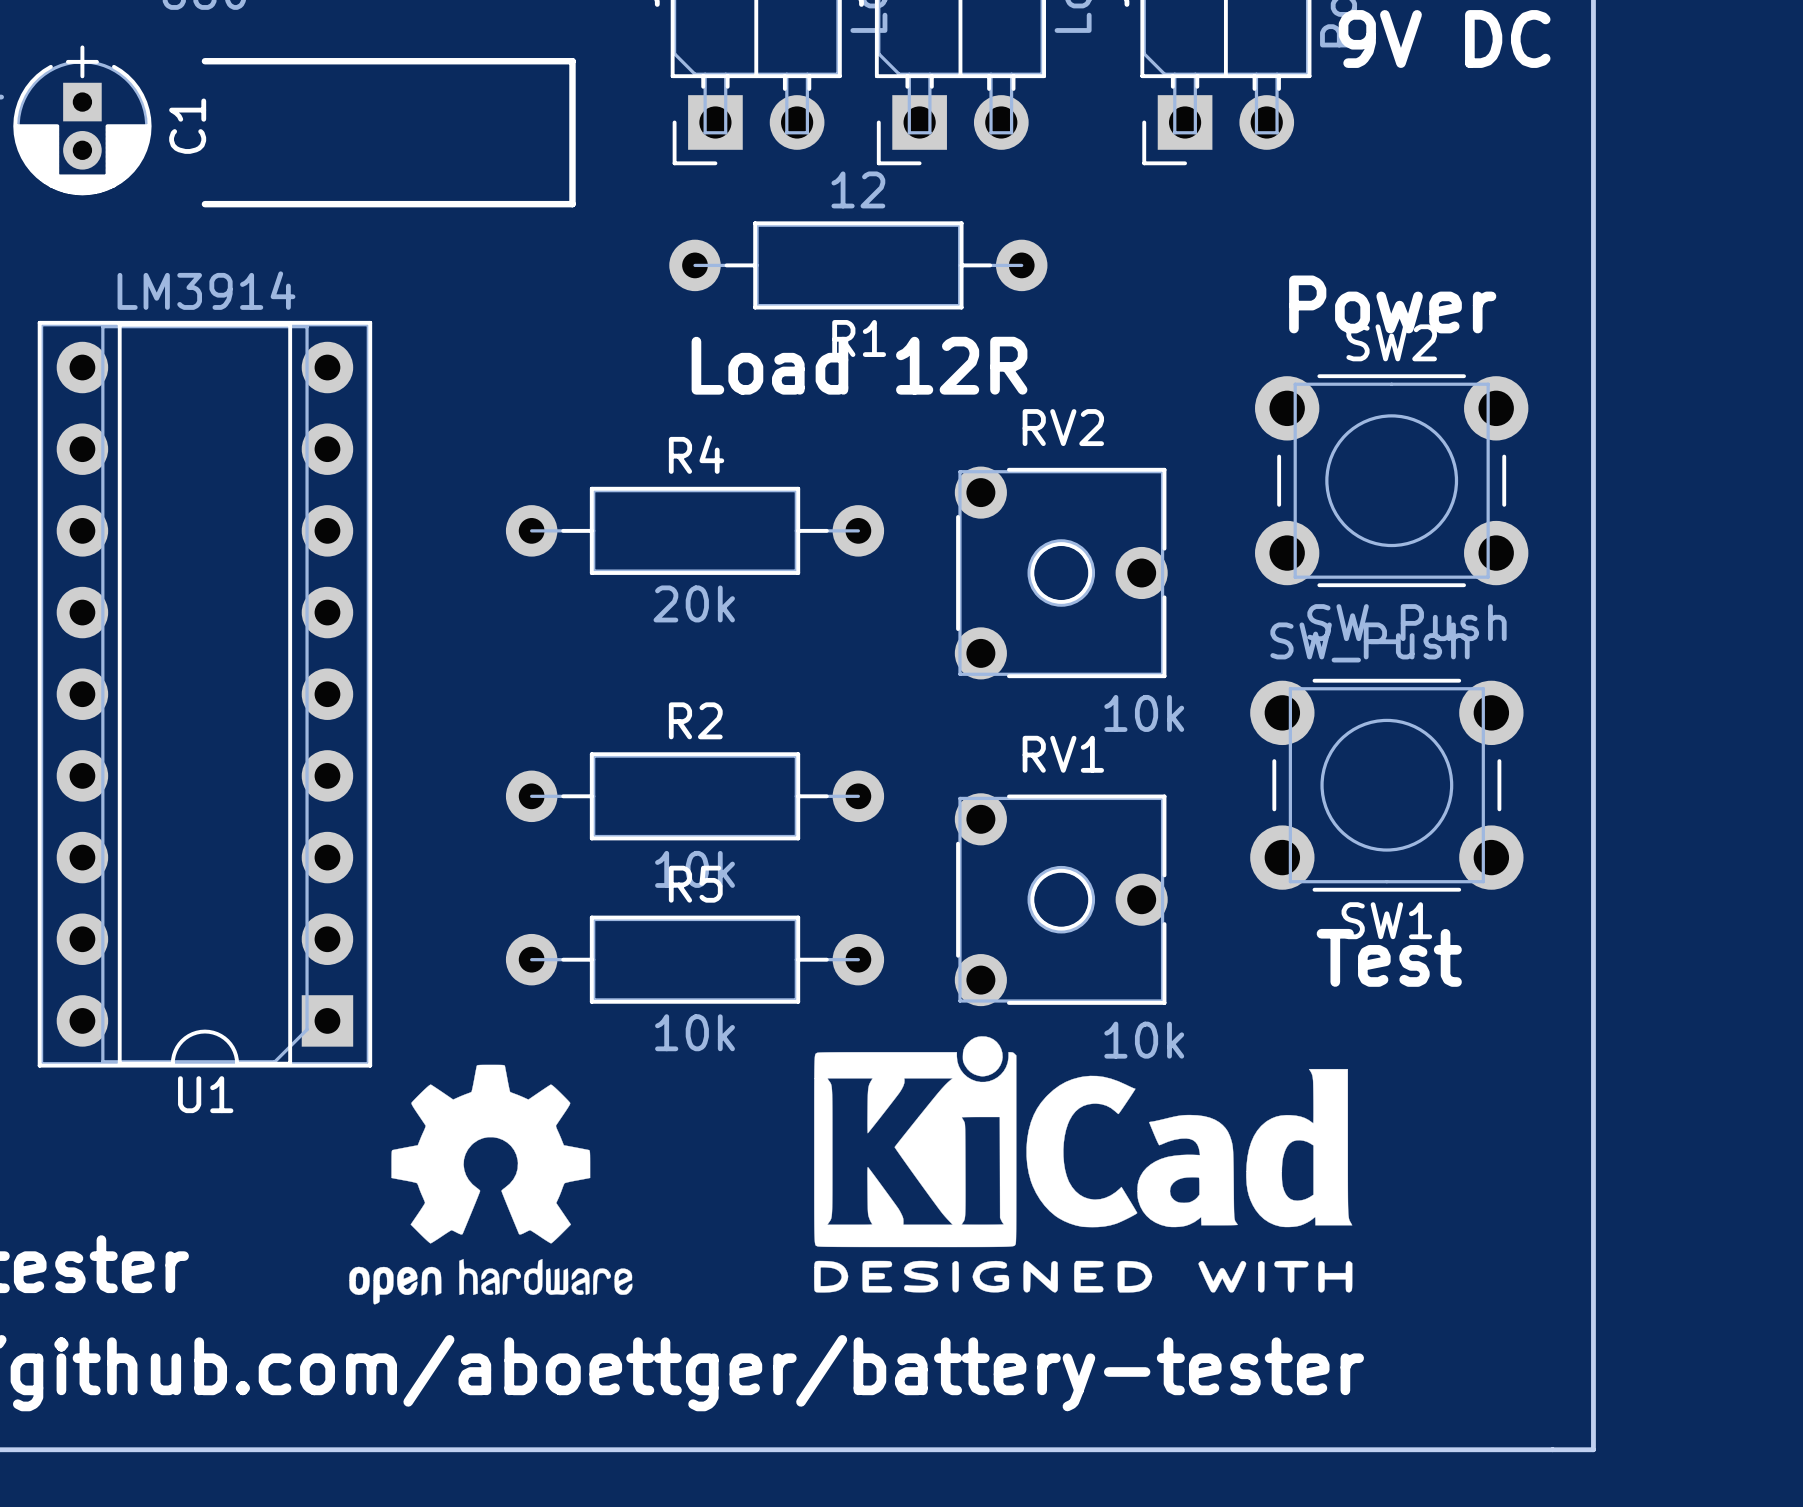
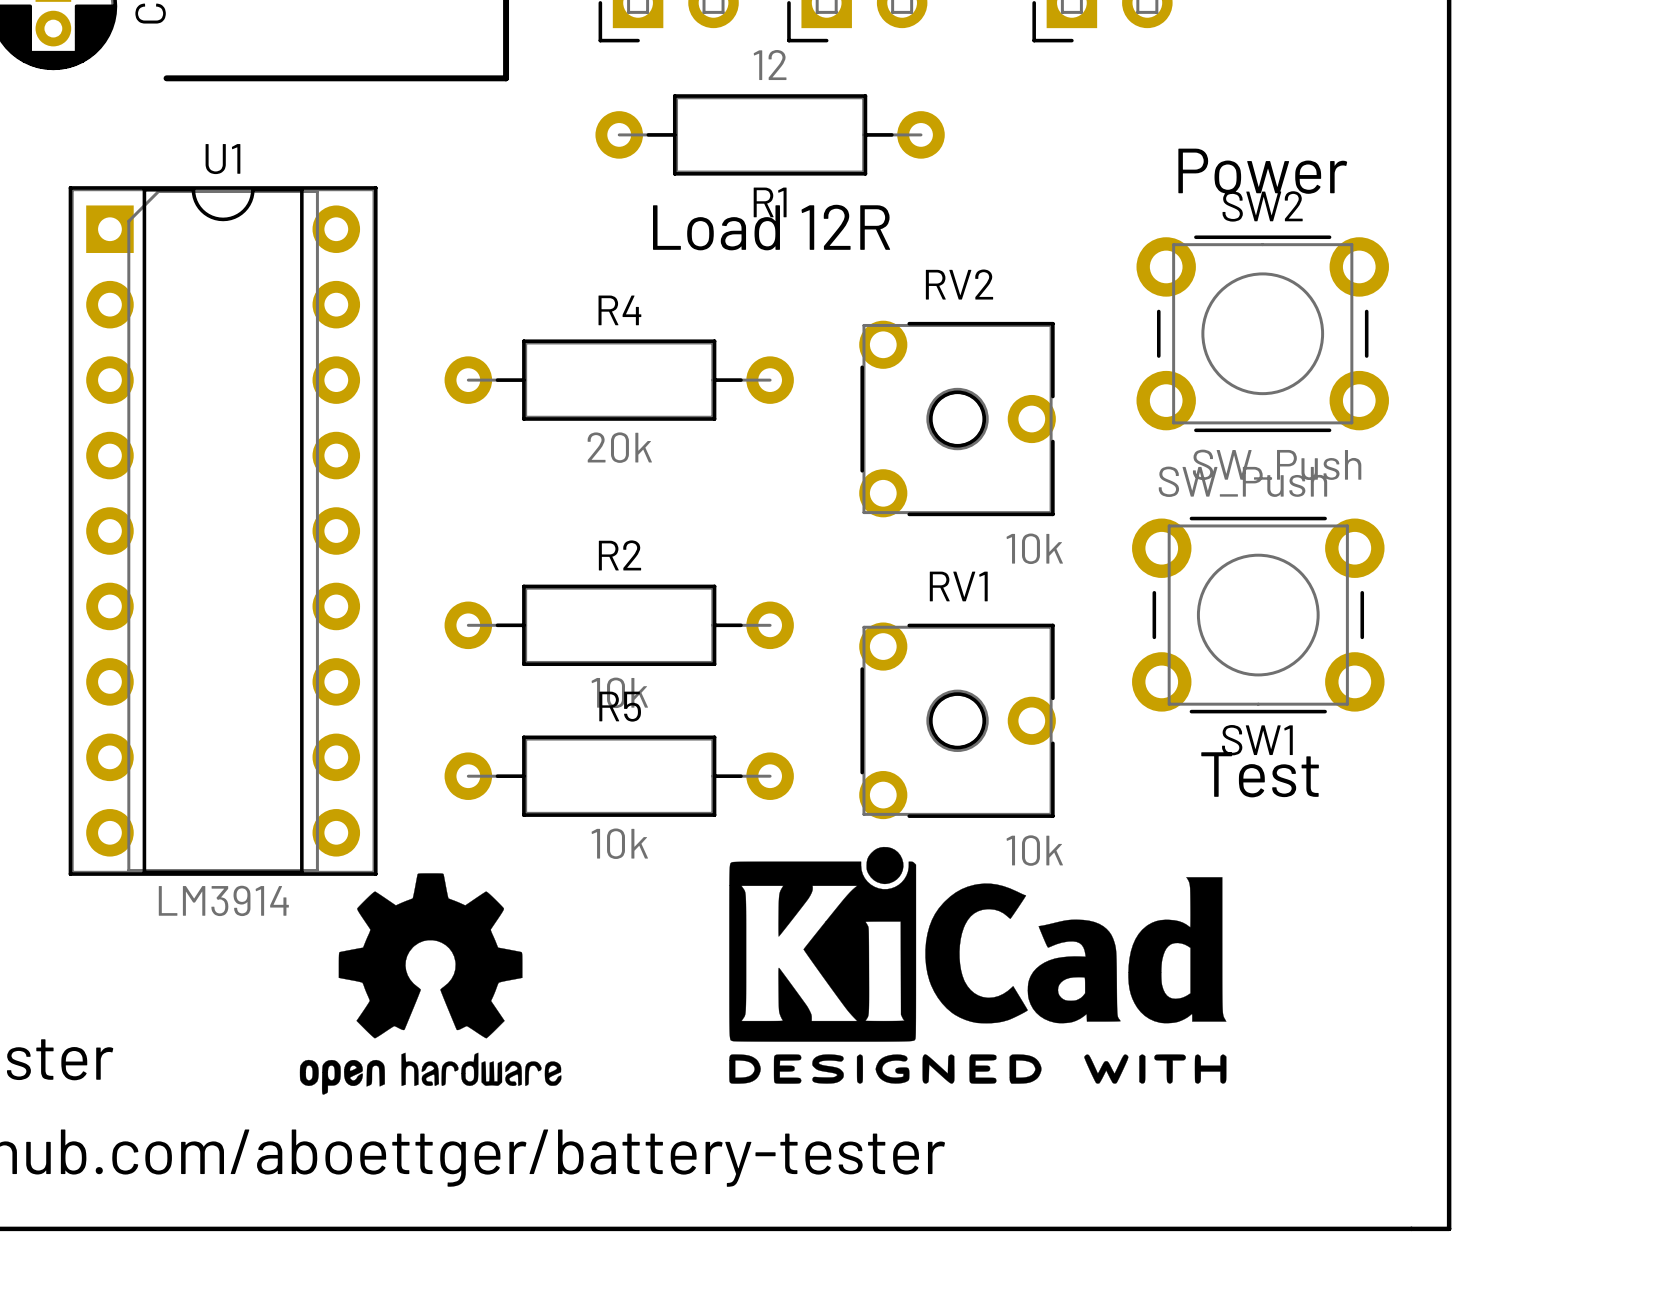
U1 rotation: 0° (204, 694) -> 180° (223, 531)

